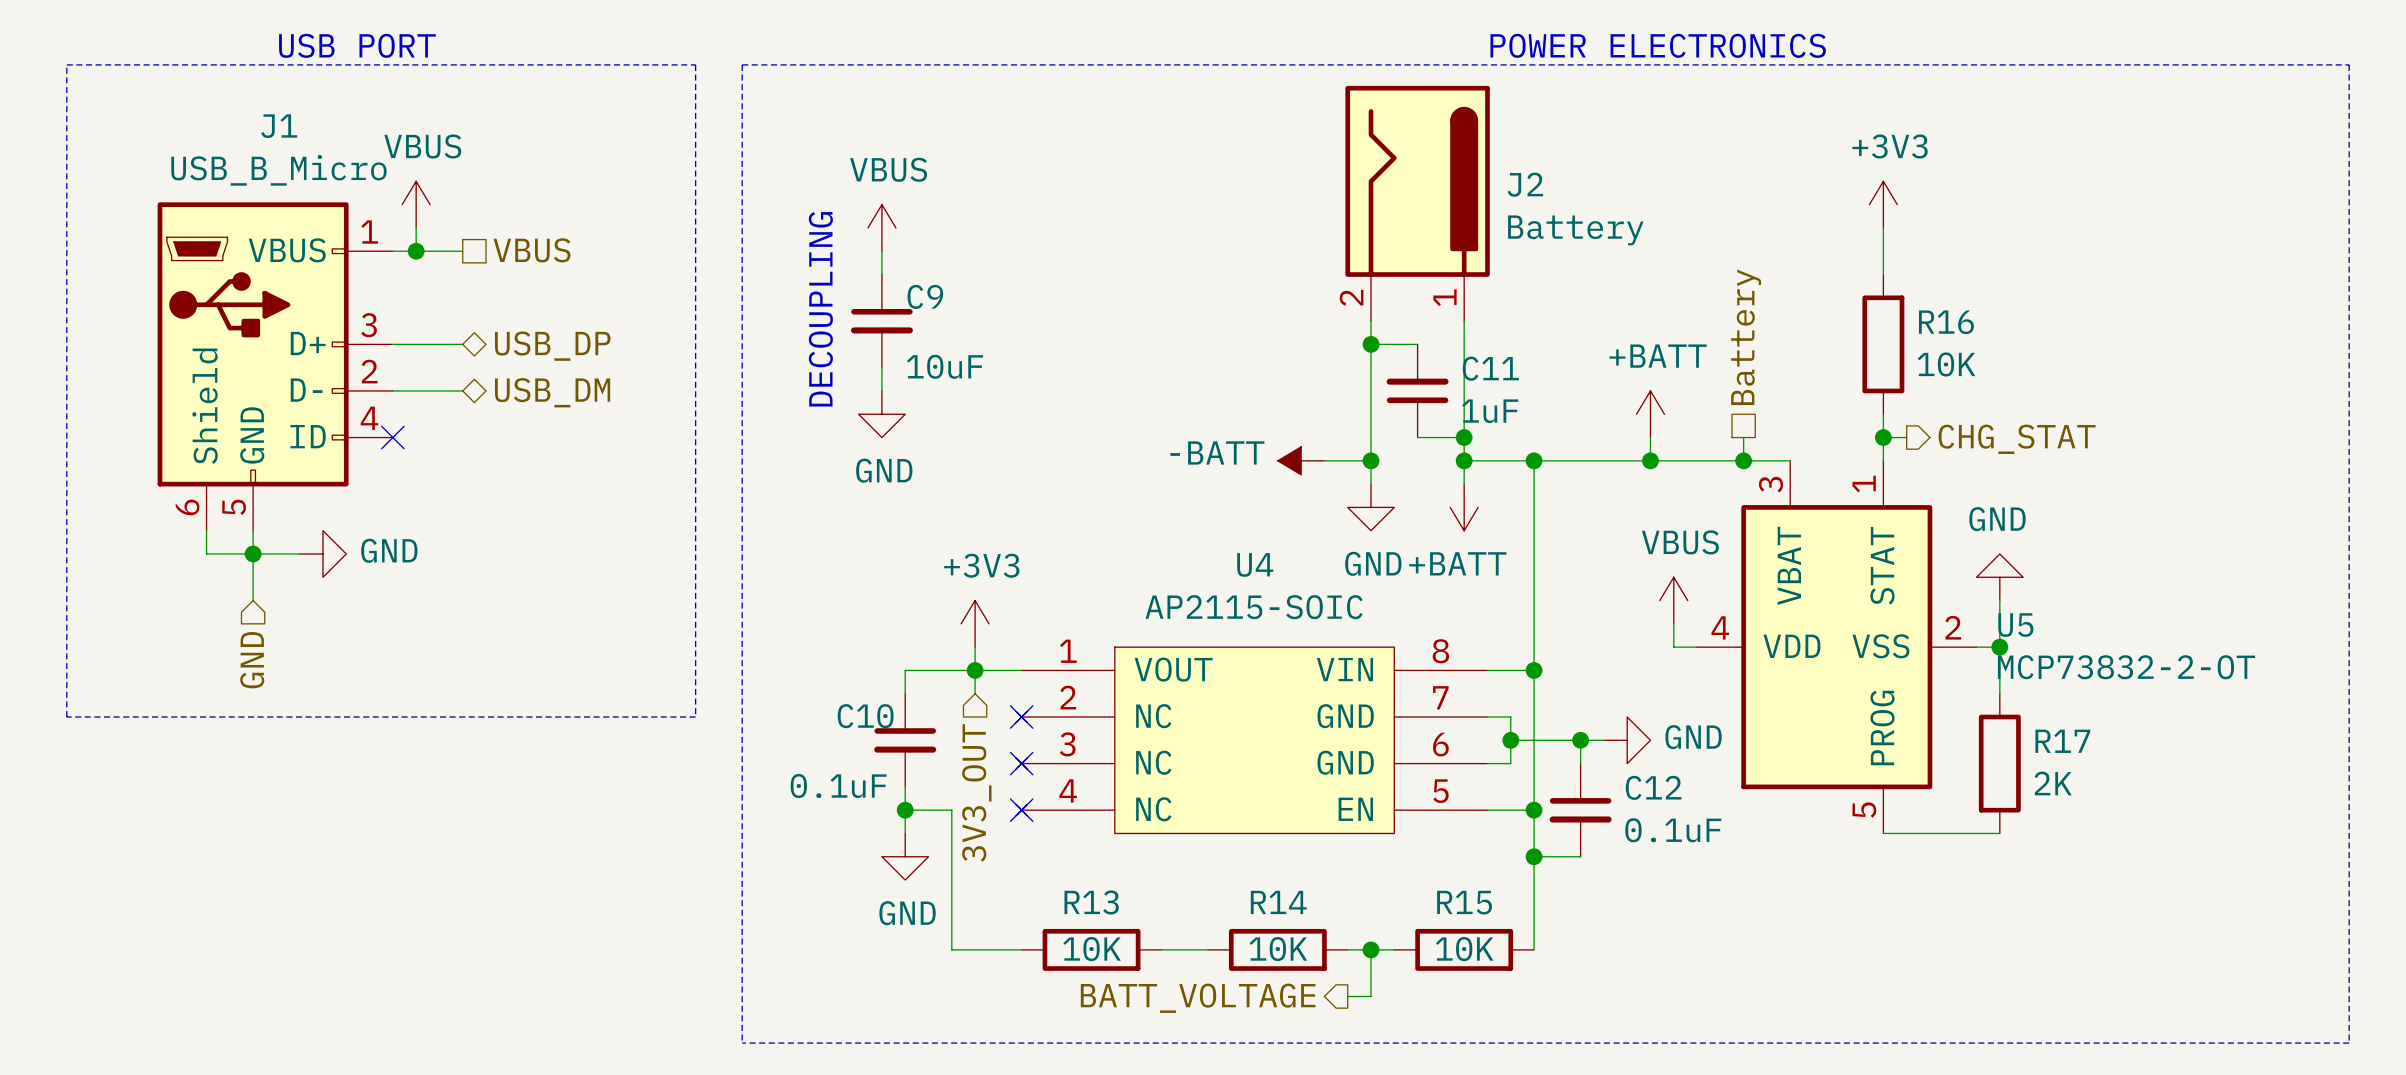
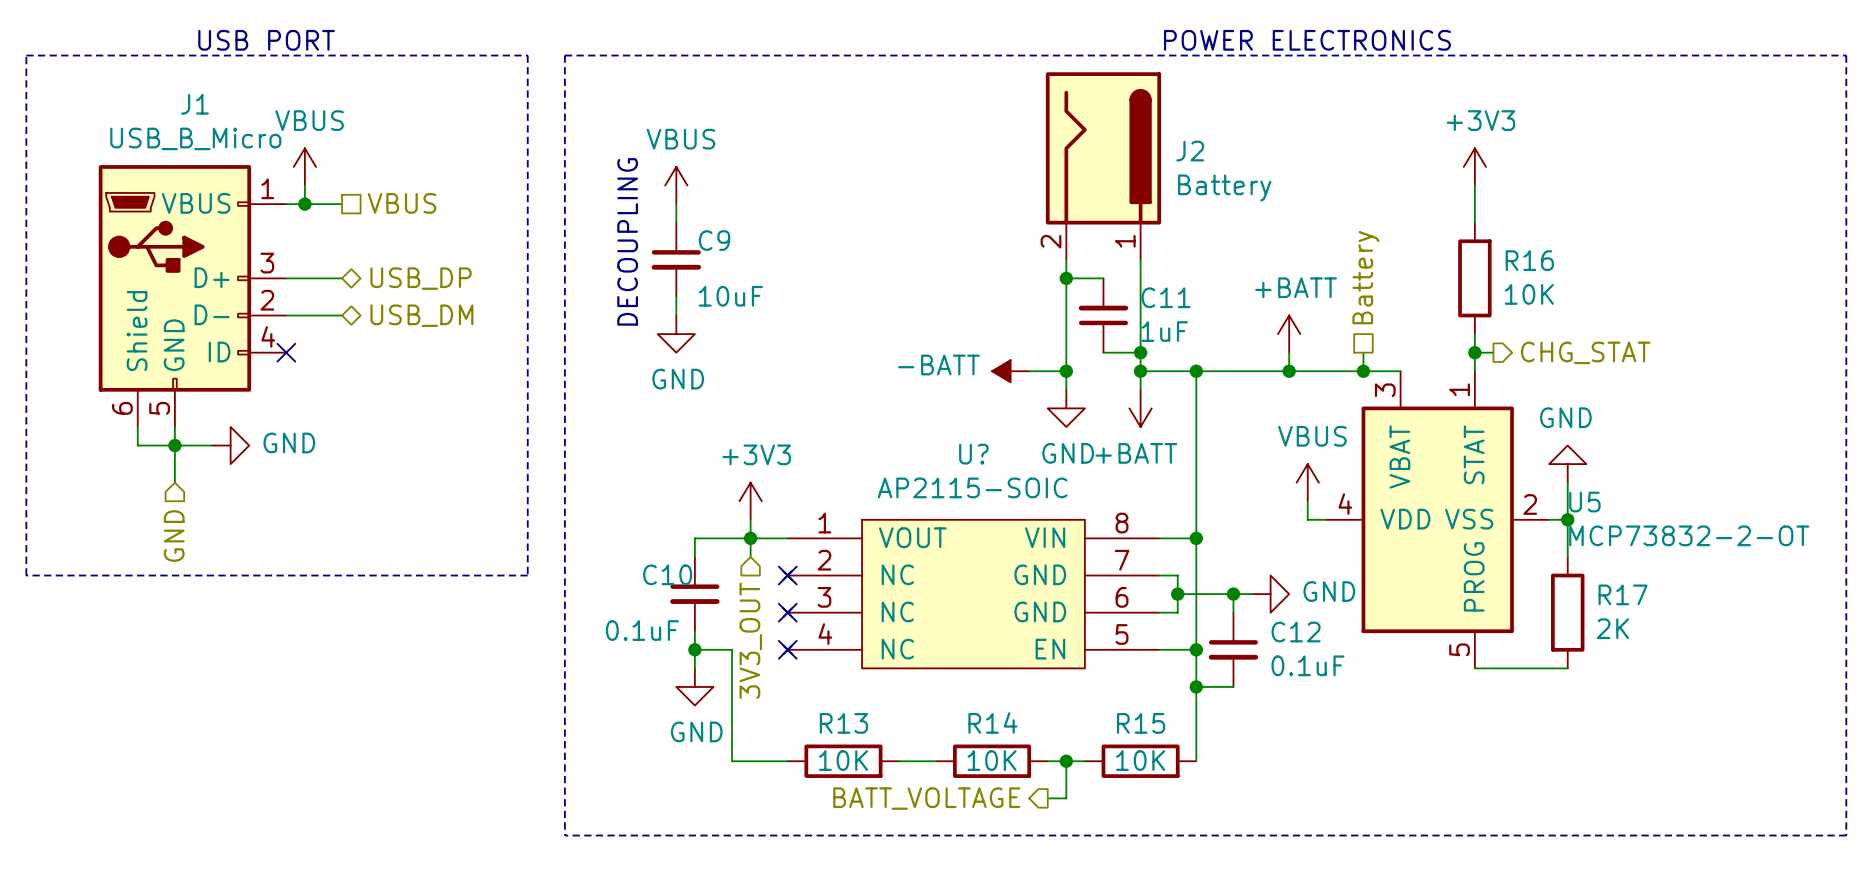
U4 name: U4 (1255, 564) -> U? (973, 454)

